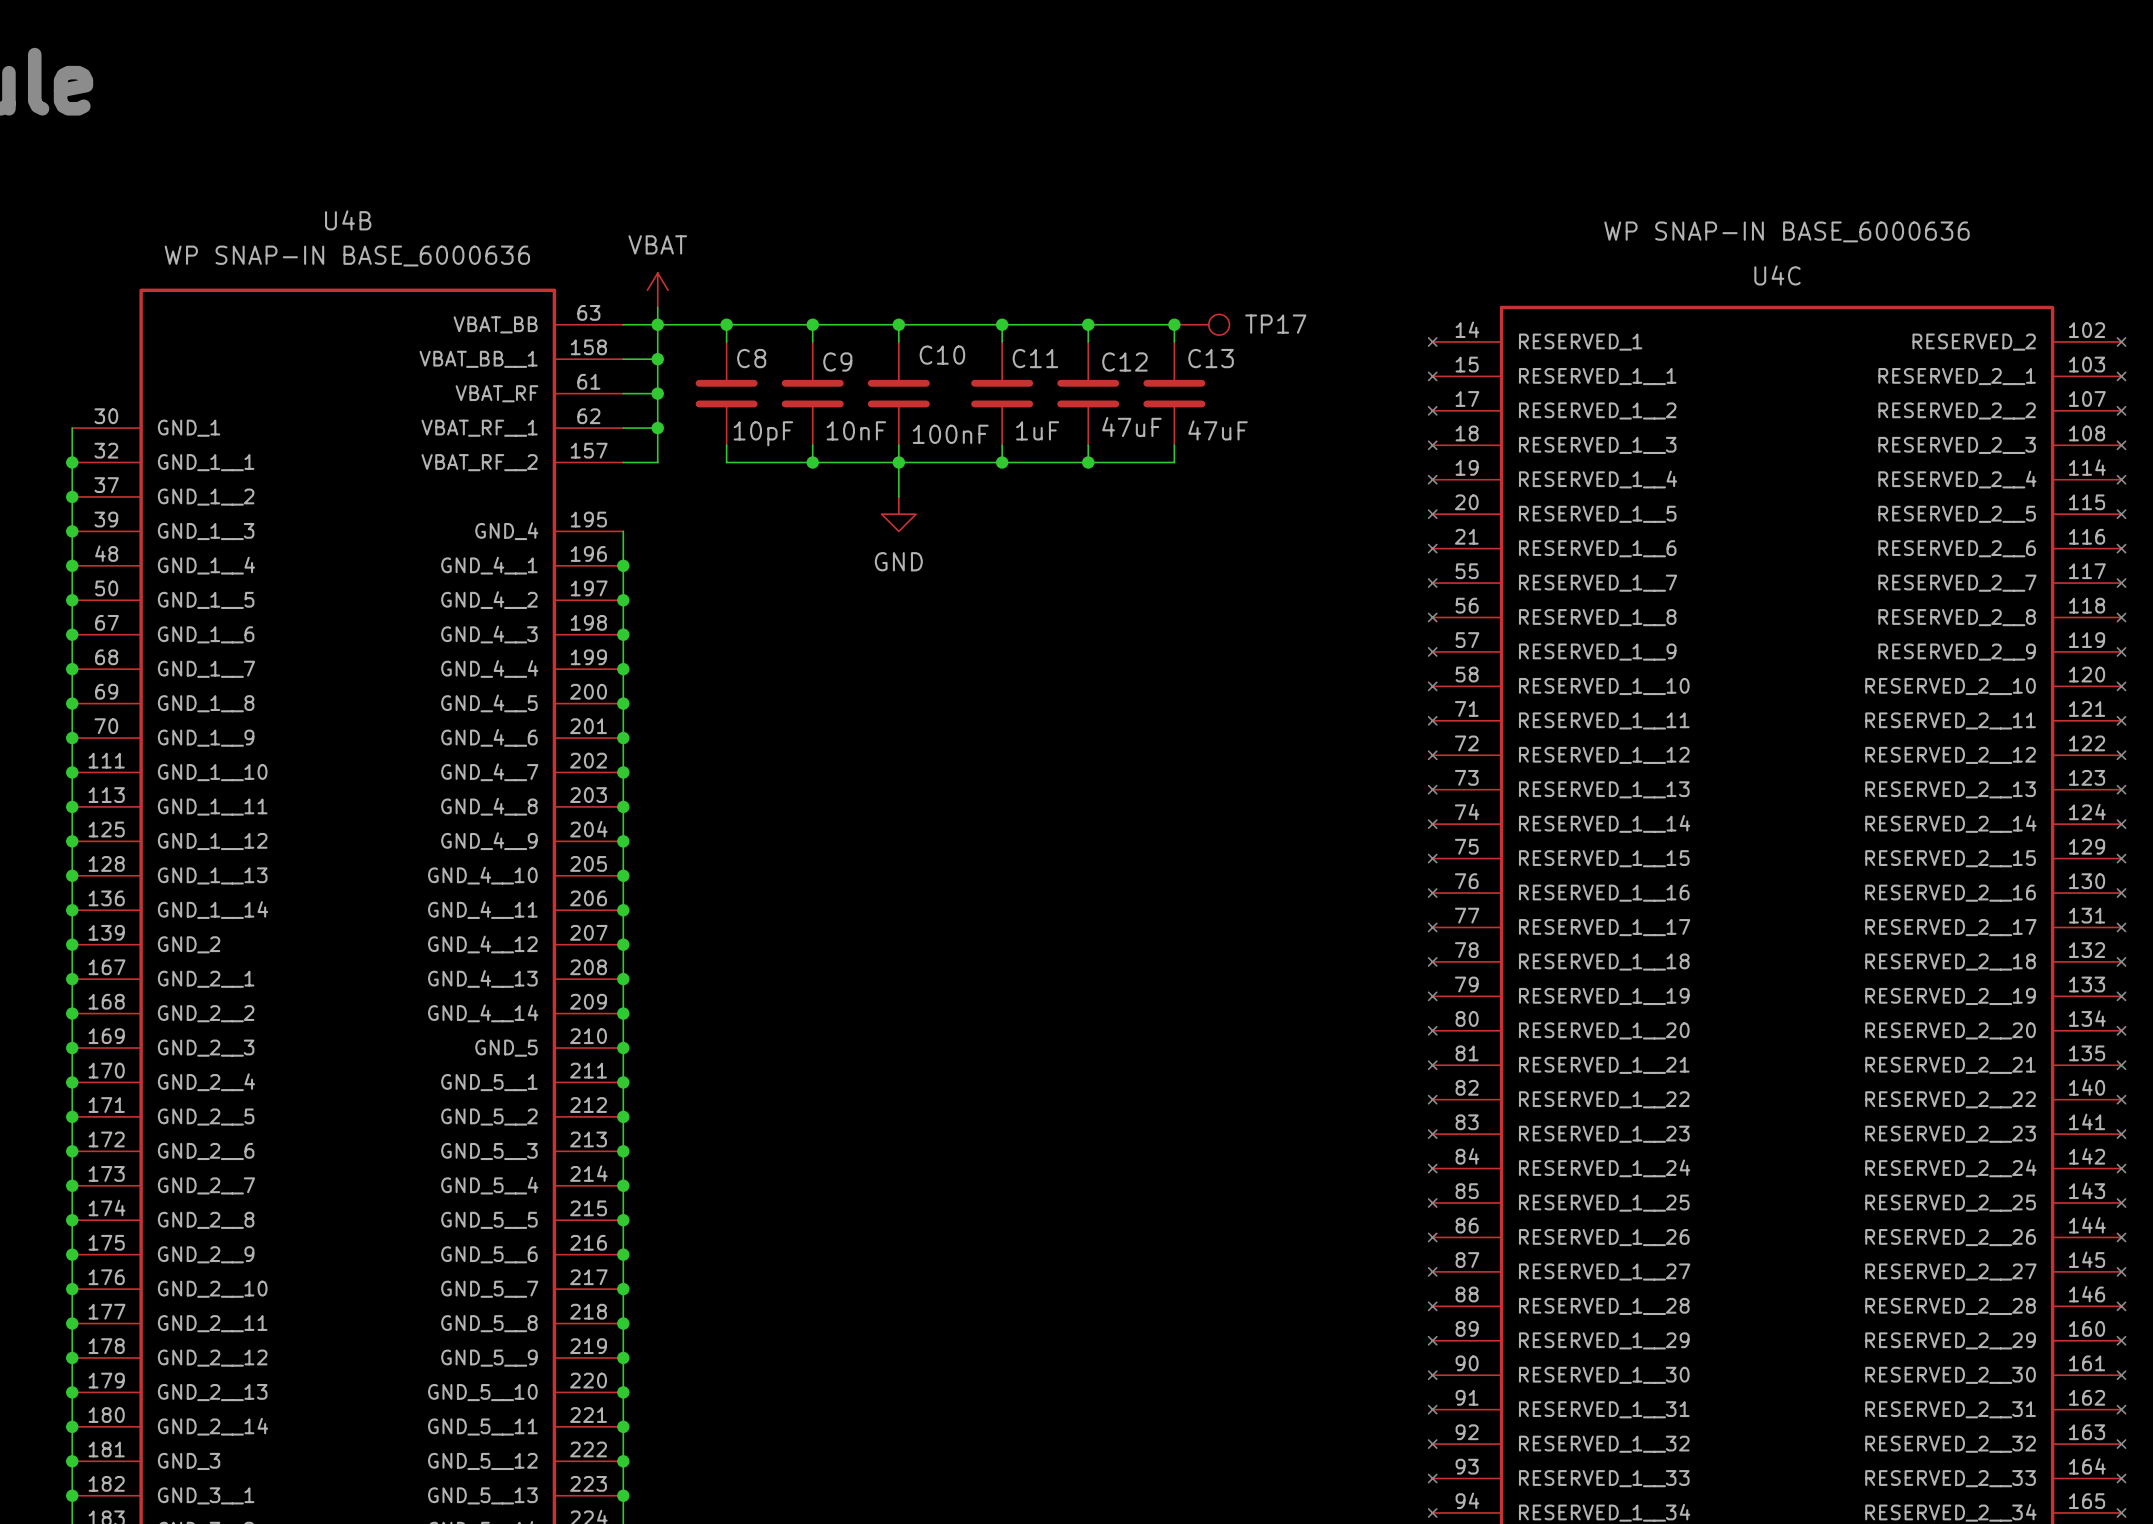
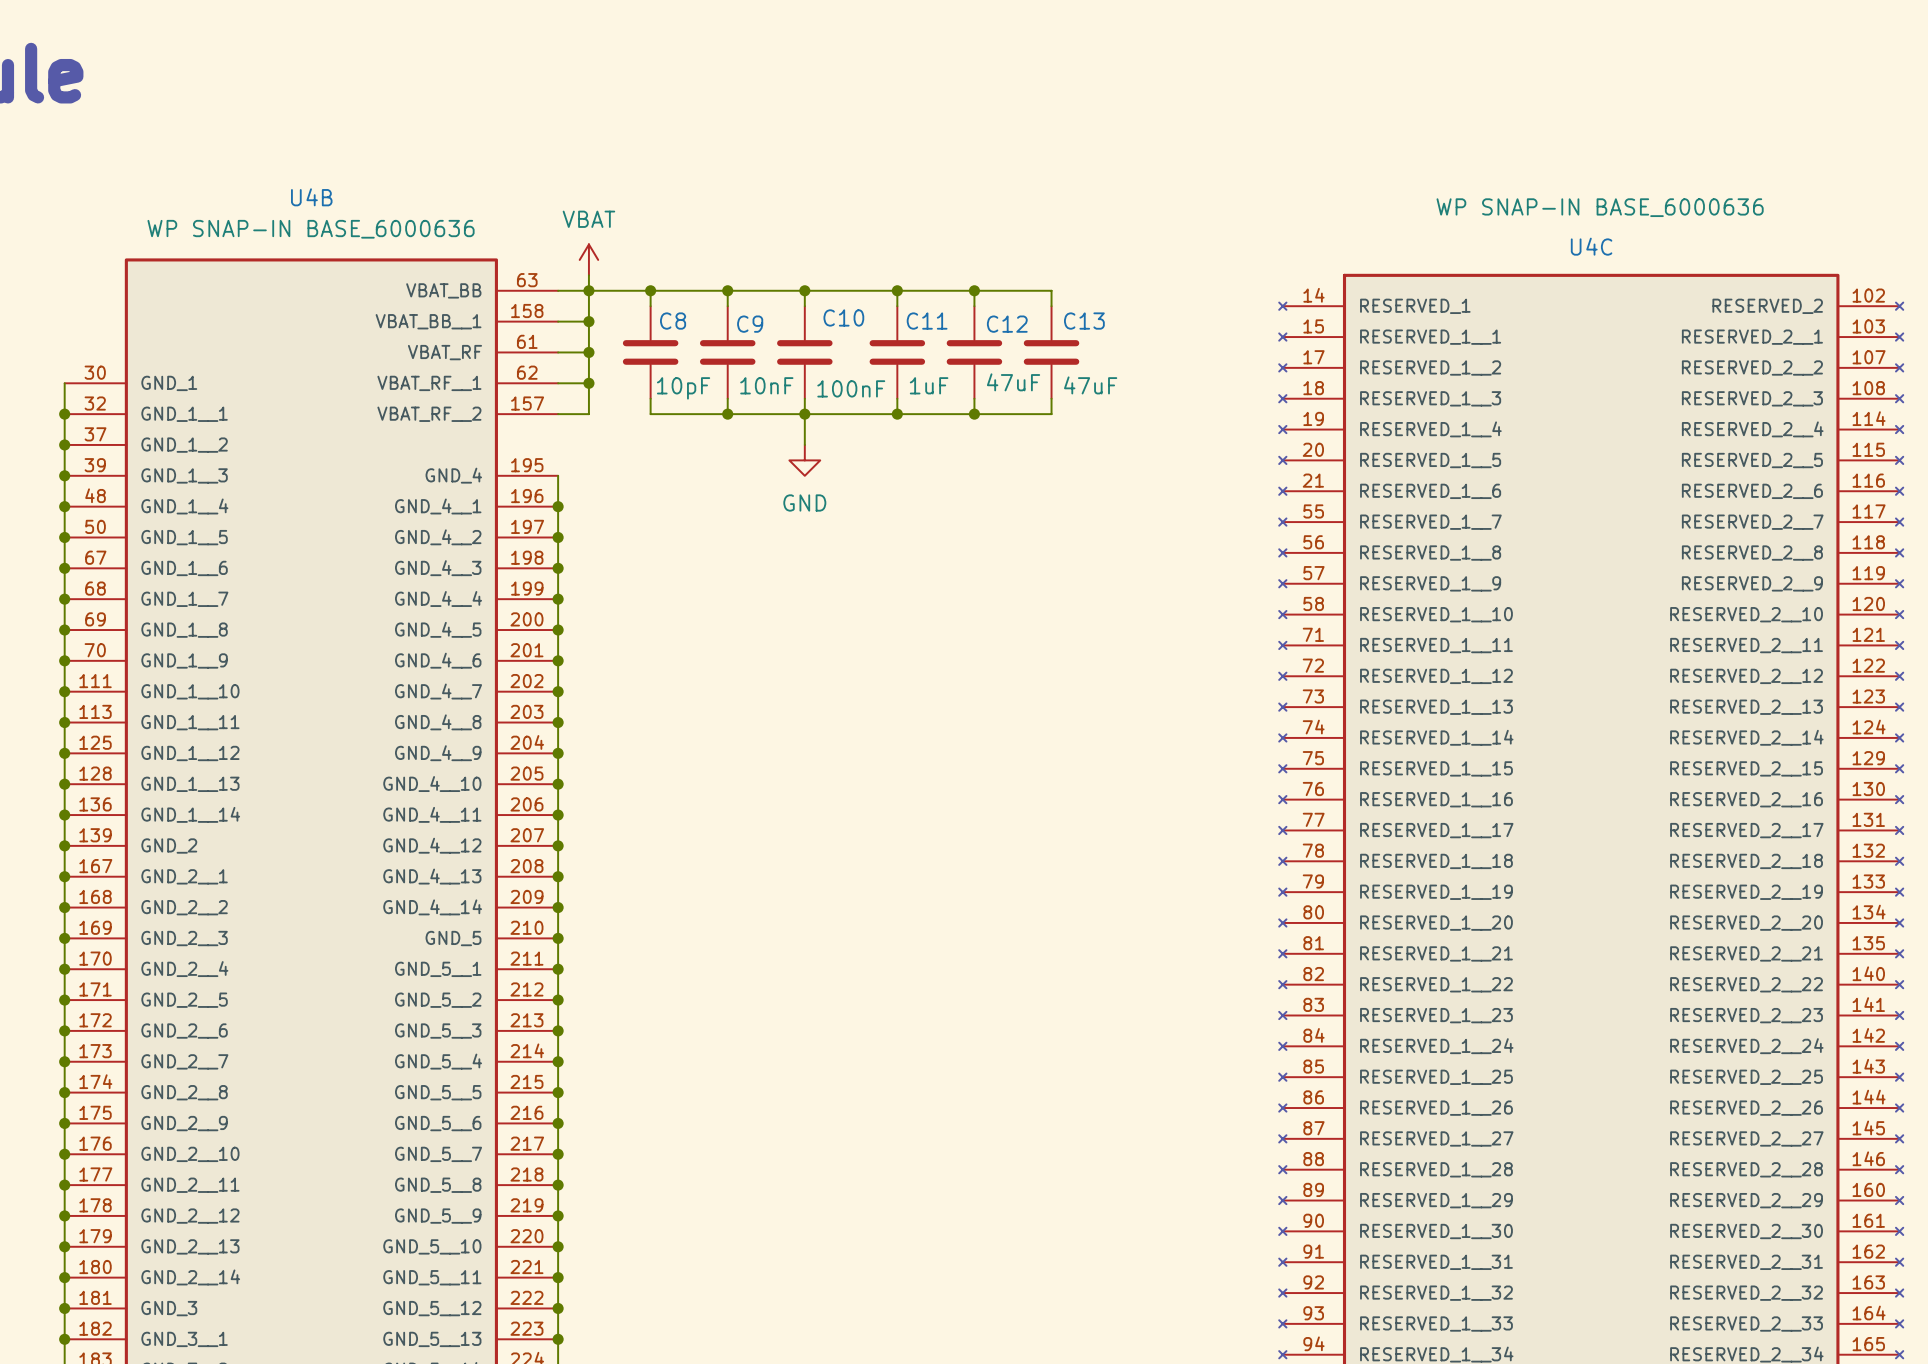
junction: (1174, 324) -> none
TP17: (1201, 324) -> none

